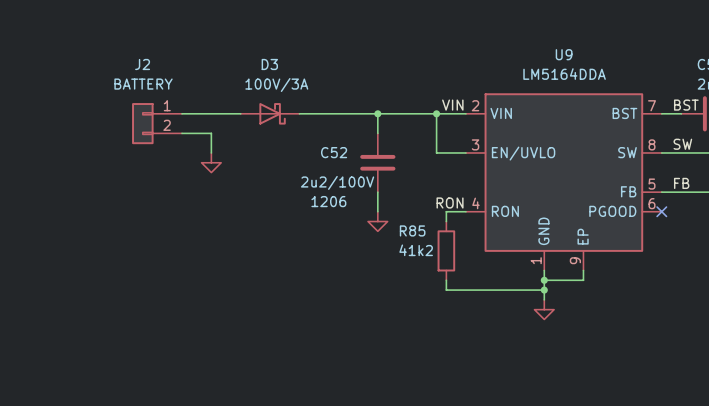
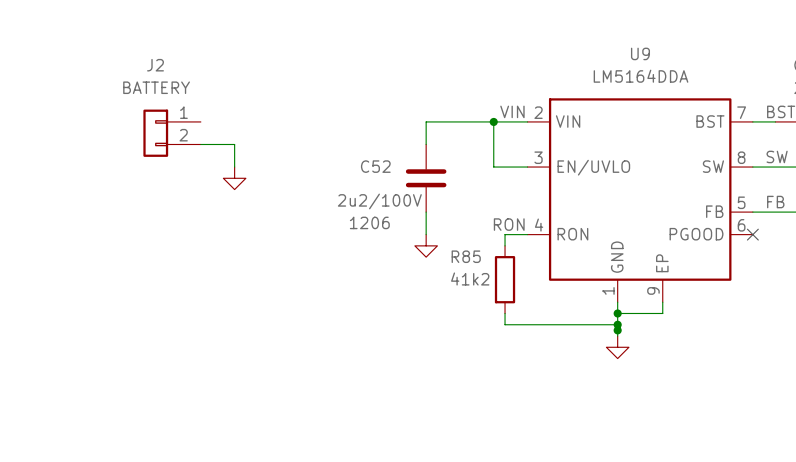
wire: (181, 113) (240, 113) -> none
D3: 100V/3A (270, 113) -> none
wire: (299, 113) (377, 113) -> none
junction: (377, 113) -> none
junction: none -> (617, 330)

